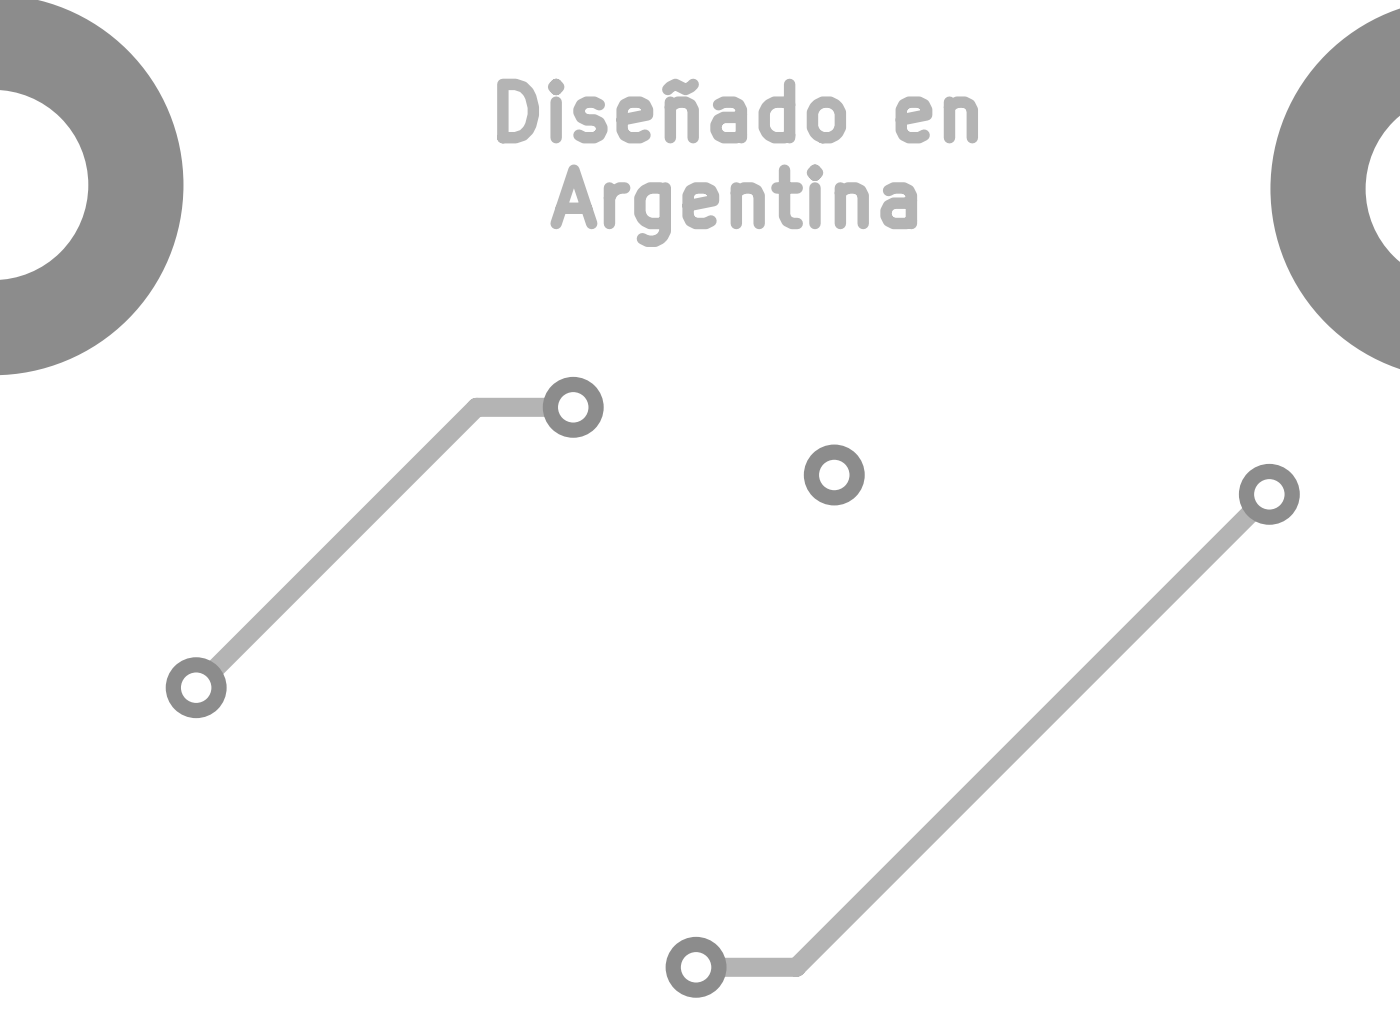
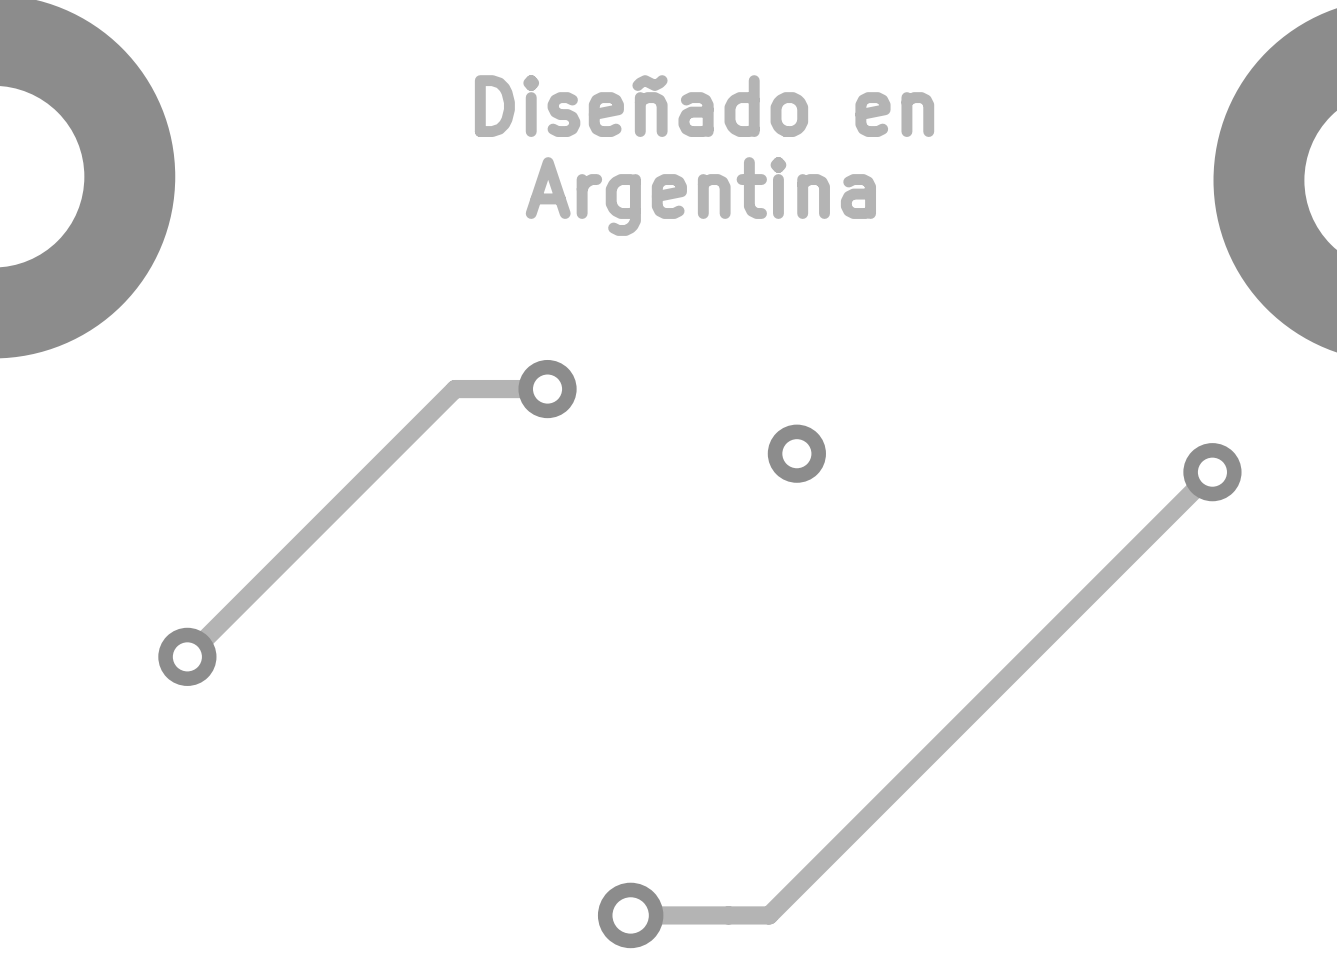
track: (805, 958) (796, 967) (696, 967) -> (769, 915) (630, 915)
via position: (696, 967) -> (630, 915)

